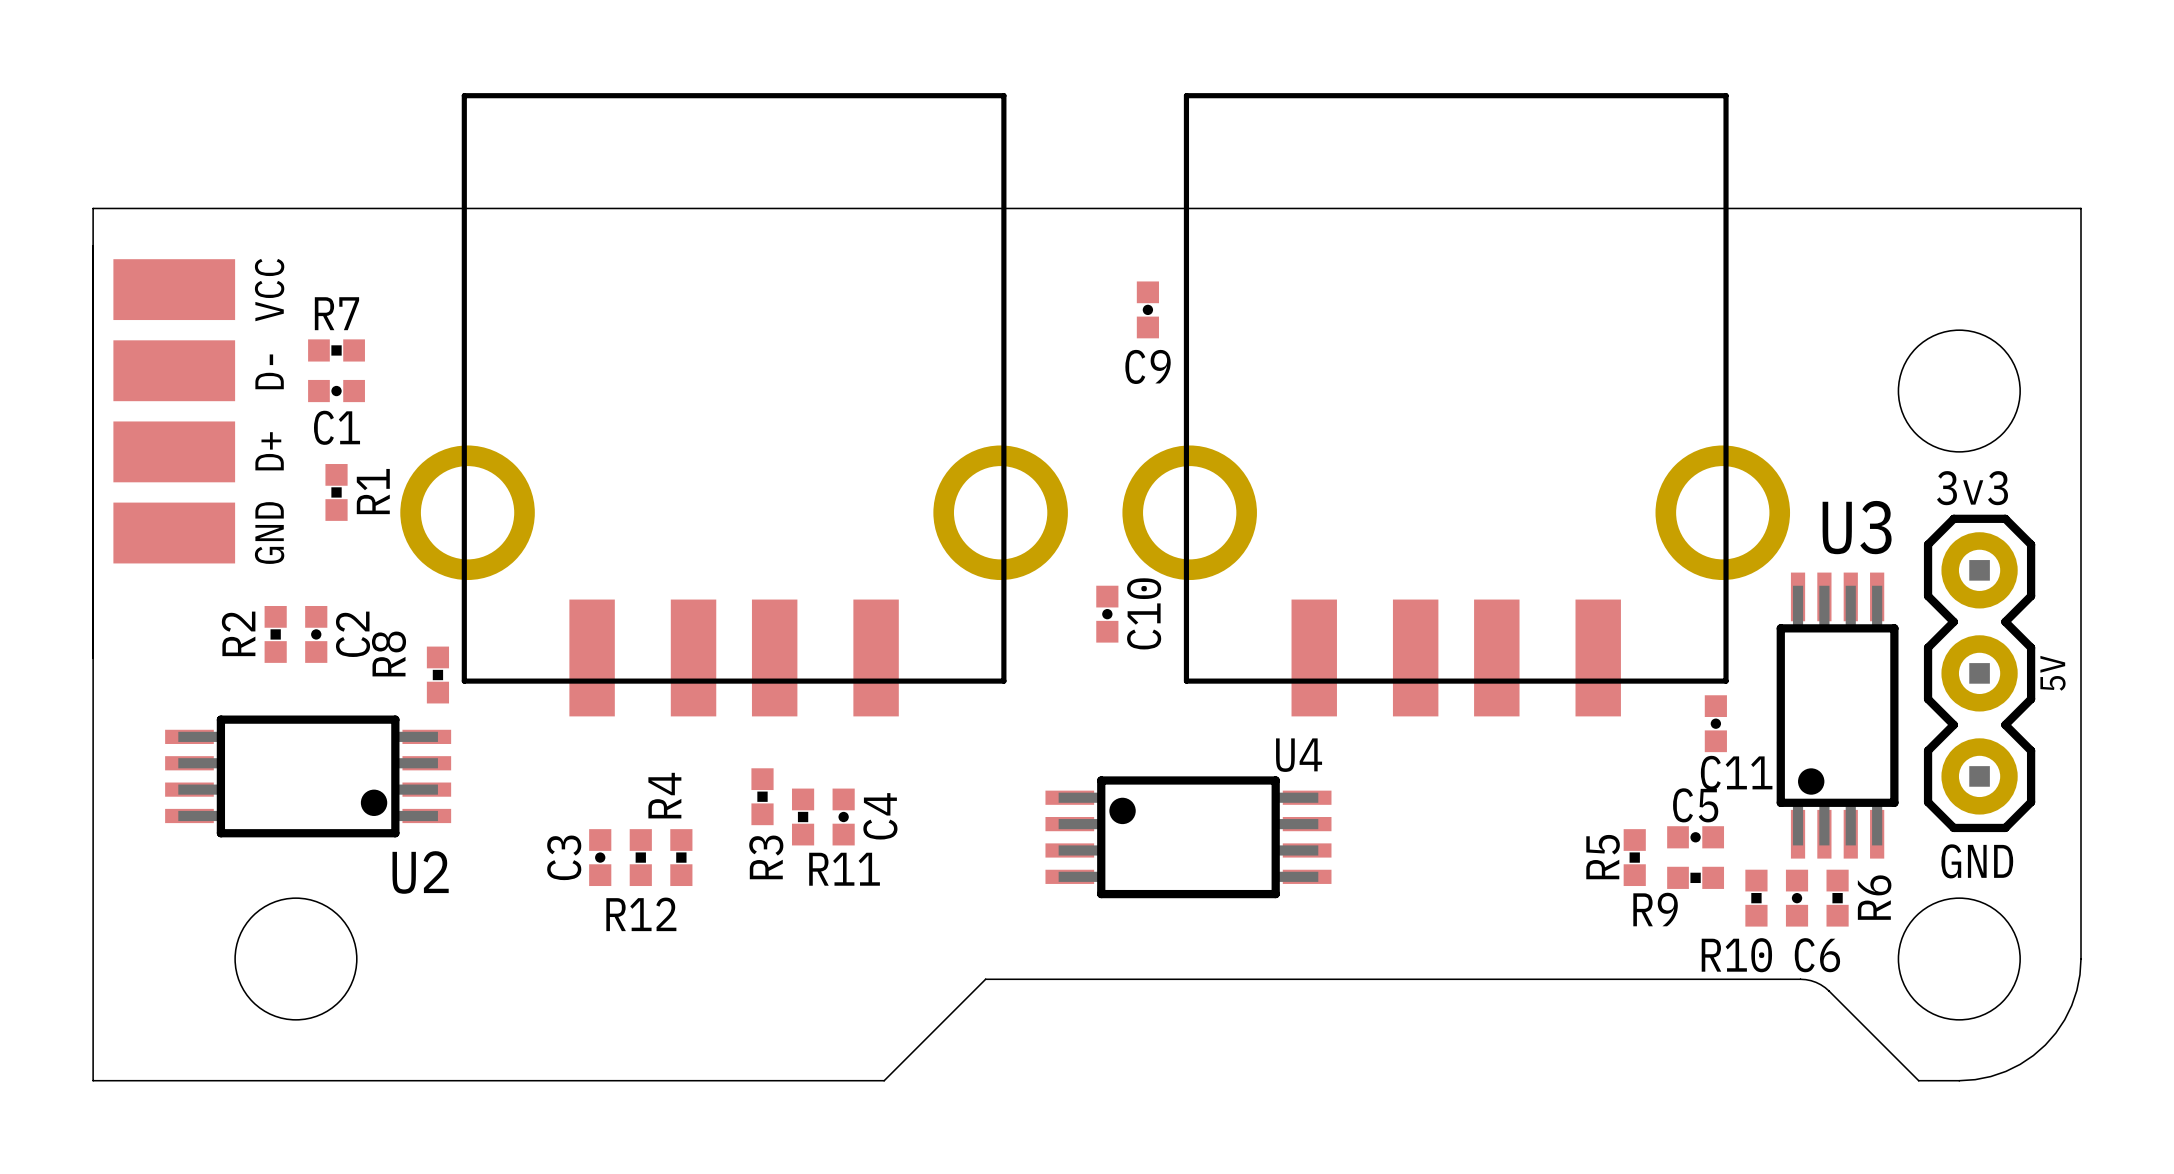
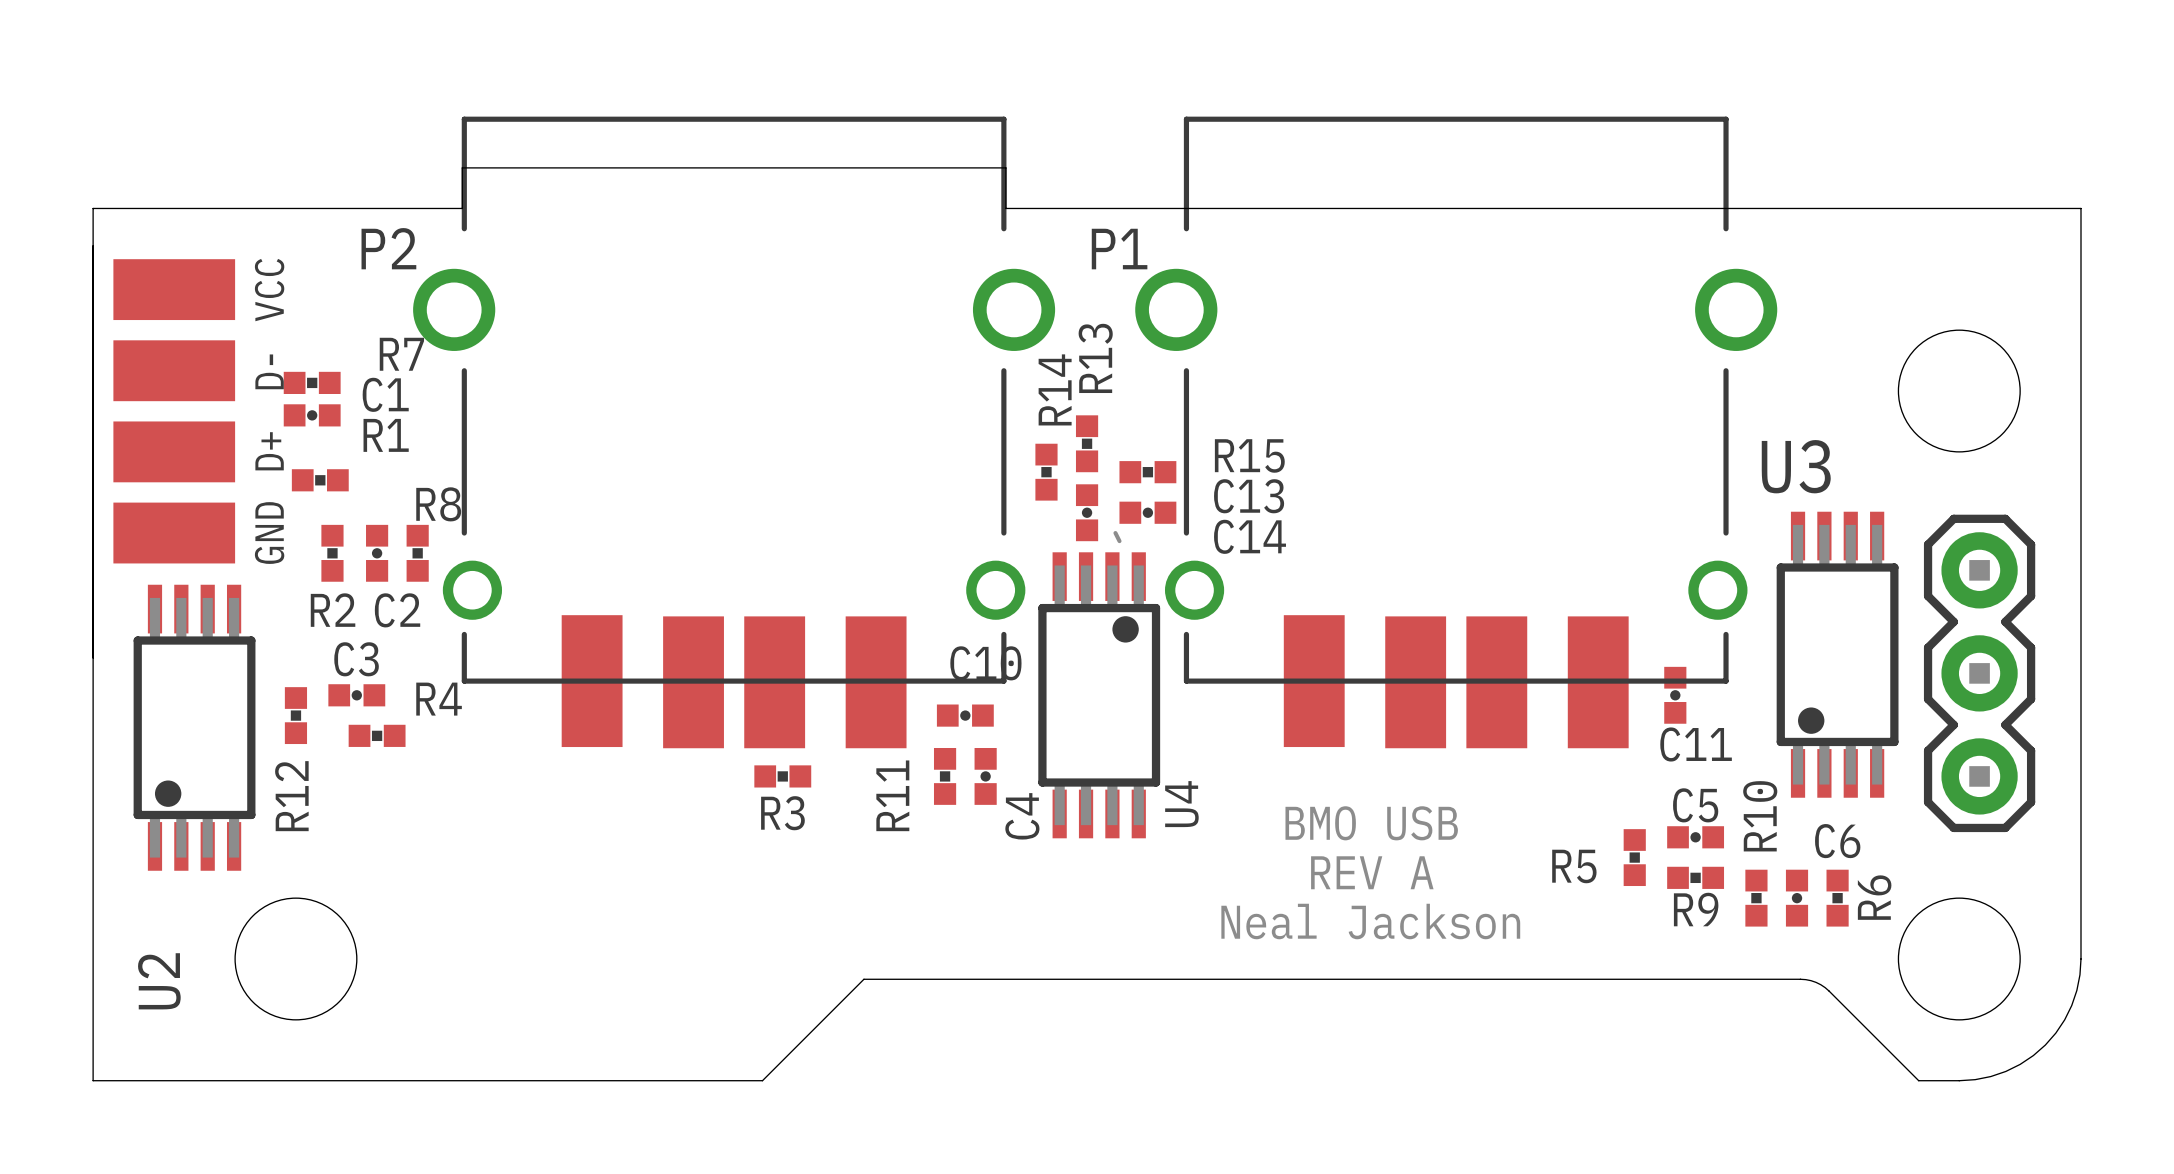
board edge: (462, 208) (1005, 208) -> (462, 208) (462, 167) (1005, 167) (1005, 208)
C9: (1147, 309) -> none
R7 name position: R7 (336, 313) -> R7 (401, 354)
R7 position: (336, 350) -> (312, 382)
C1 position: (336, 391) -> (312, 415)
part: (734, 404) -> none
part: (1456, 404) -> none
C1 name position: C1 (337, 427) -> C1 (385, 394)
P2: none -> (734, 432)
P1: none -> (1456, 432)
R13: none -> (1087, 443)
R14: none -> (1046, 472)
R15: none -> (1147, 472)
text: 3v3 (1972, 488) -> none
R1 rotation: 0° (336, 492) -> 90° clockwise (320, 480)
C14: none -> (1087, 512)
C13: none -> (1147, 512)
U3 name position: U3 (1857, 527) -> U3 (1796, 466)
line: none -> (1115, 533) (1119, 541)
C10 rotation: 0° (1107, 614) -> 90° clockwise (965, 715)
C10 position: (1107, 614) -> (965, 715)
R2 name rotation: 0° (238, 633) -> 90° clockwise (333, 610)
R2 position: (275, 634) -> (332, 553)
C2 position: (316, 634) -> (377, 553)
C2 name rotation: 0° (353, 634) -> 90° clockwise (397, 610)
R8 name rotation: 0° (389, 653) -> 90° clockwise (438, 504)
text: 5V (2053, 673) -> none
R8 position: (437, 675) -> (417, 553)
U3 position: (1837, 715) -> (1837, 654)
C11 position: (1715, 723) -> (1675, 695)
U2 rotation: 0° (308, 776) -> 90° clockwise (194, 727)
R3 rotation: 0° (762, 796) -> 90° clockwise (782, 776)
C4 name position: C4 (880, 816) -> C4 (1022, 816)
R11 position: (803, 817) -> (945, 776)
C4 position: (843, 817) -> (985, 776)
text: none -> BMO USB (1371, 823)
U4 rotation: 0° (1188, 837) -> 90° clockwise (1099, 695)
C3 rotation: 0° (600, 857) -> 90° clockwise (356, 695)
C3 position: (600, 857) -> (356, 695)
R12 position: (640, 857) -> (295, 715)
R4 rotation: 0° (681, 857) -> 90° clockwise (377, 735)
R4 position: (681, 857) -> (377, 735)
R5 name rotation: 0° (1603, 857) -> 90° clockwise (1574, 866)
text: GND (1977, 861) -> none
R11 name rotation: 0° (844, 869) -> 90° counterclockwise (892, 795)
U2 name position: U2 (420, 872) -> U2 (159, 981)
text: none -> REV A (1372, 872)
R9 name position: R9 (1655, 909) -> R9 (1696, 909)
R12 name rotation: 0° (641, 914) -> 90° counterclockwise (291, 796)
text: none -> Neal Jackson (1370, 921)
R10 name rotation: 0° (1736, 955) -> 90° counterclockwise (1760, 816)
R10 name position: R10 (1736, 955) -> R10 (1760, 816)
C6 name position: C6 (1817, 955) -> C6 (1837, 841)
board edge: (985, 979) (884, 1080) (762, 1080) -> (985, 979) (863, 979) (762, 1080)

